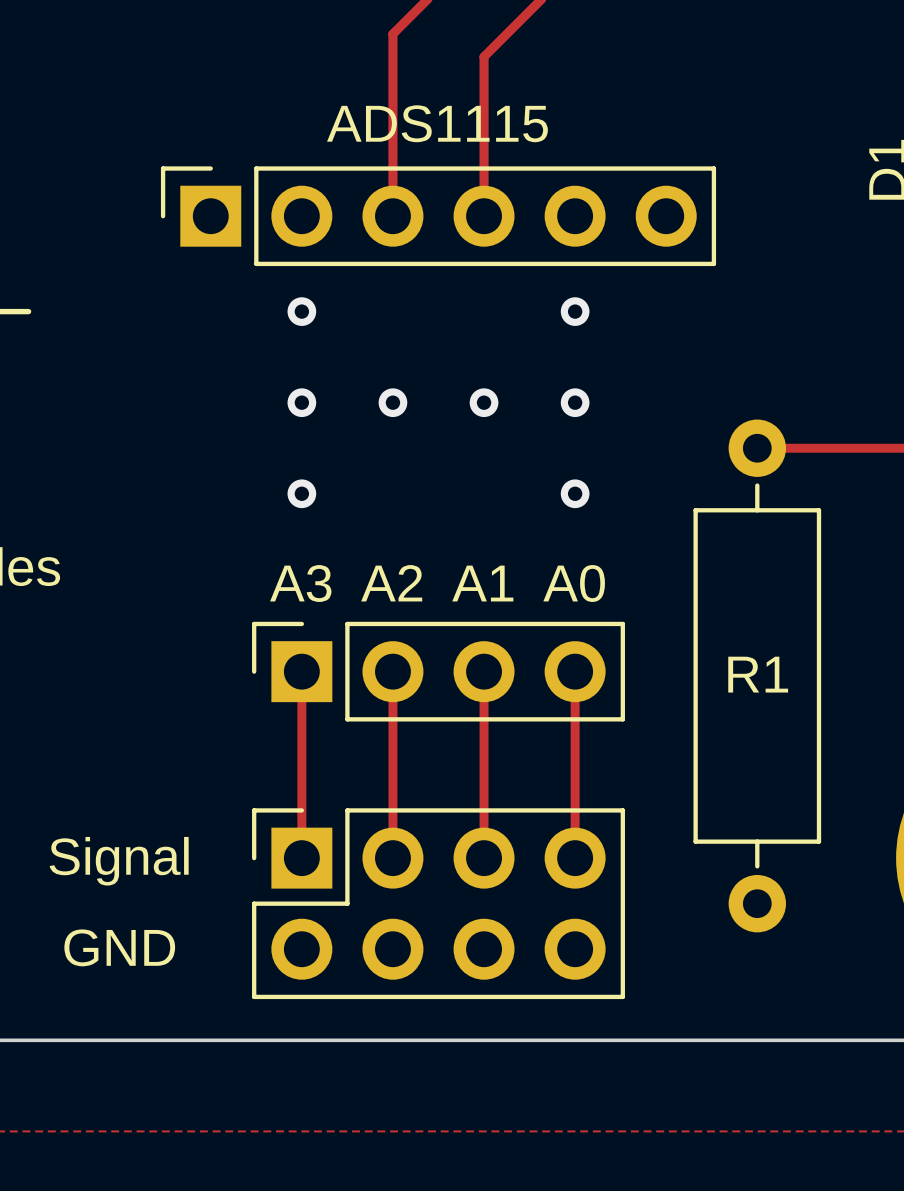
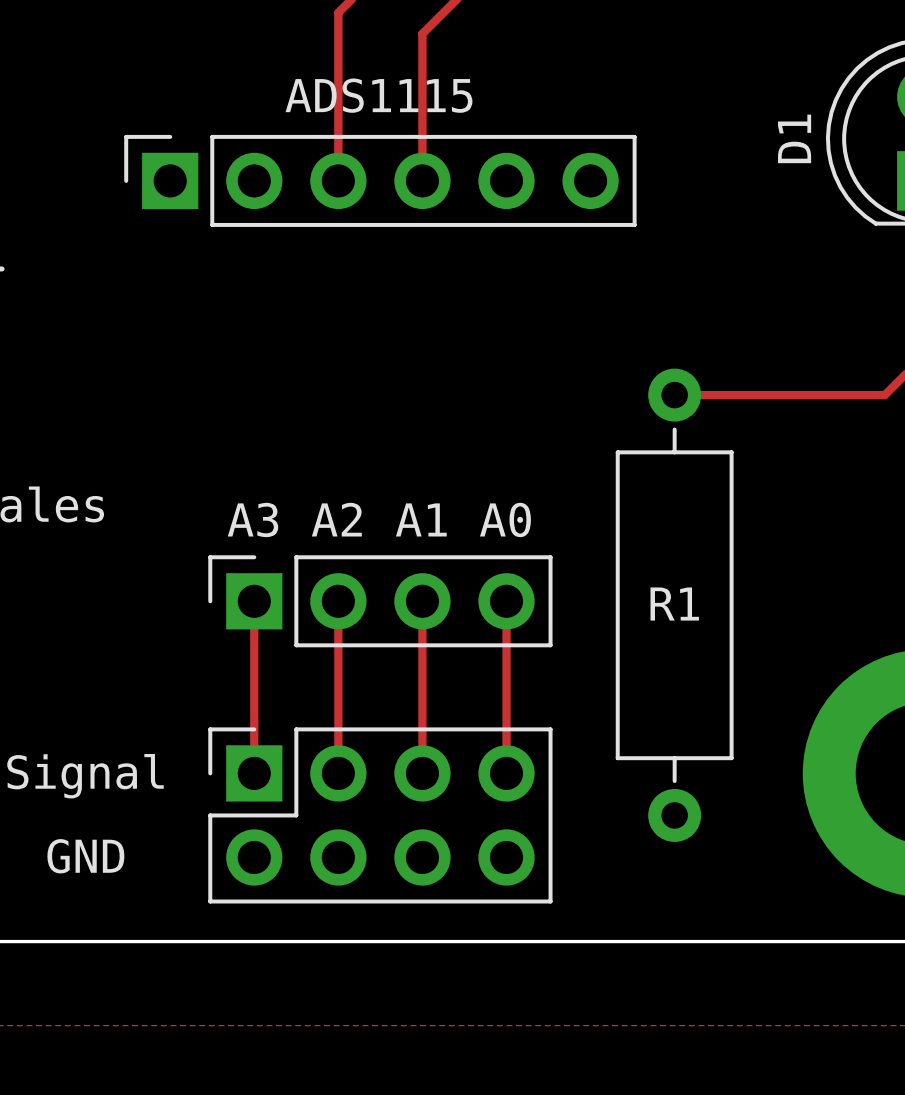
via: (301, 311) -> none
via: (575, 311) -> none
via: (301, 402) -> none
via: (392, 402) -> none
via: (484, 402) -> none
via: (575, 402) -> none
via: (301, 493) -> none
via: (575, 493) -> none

